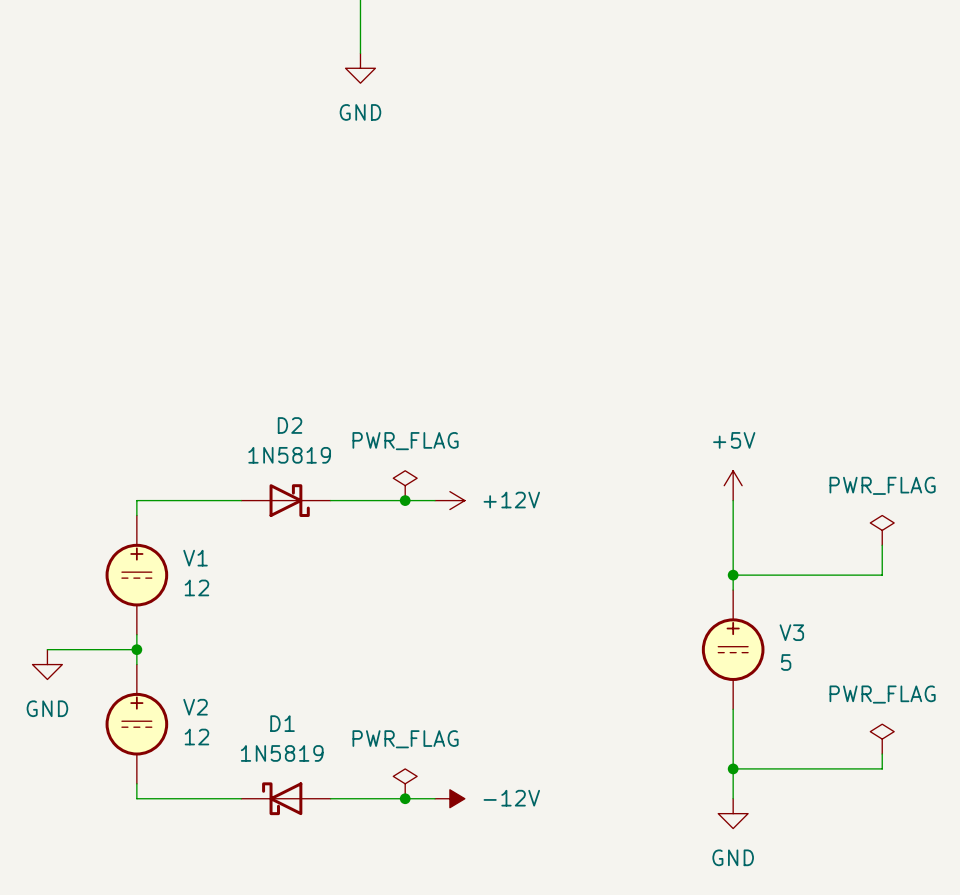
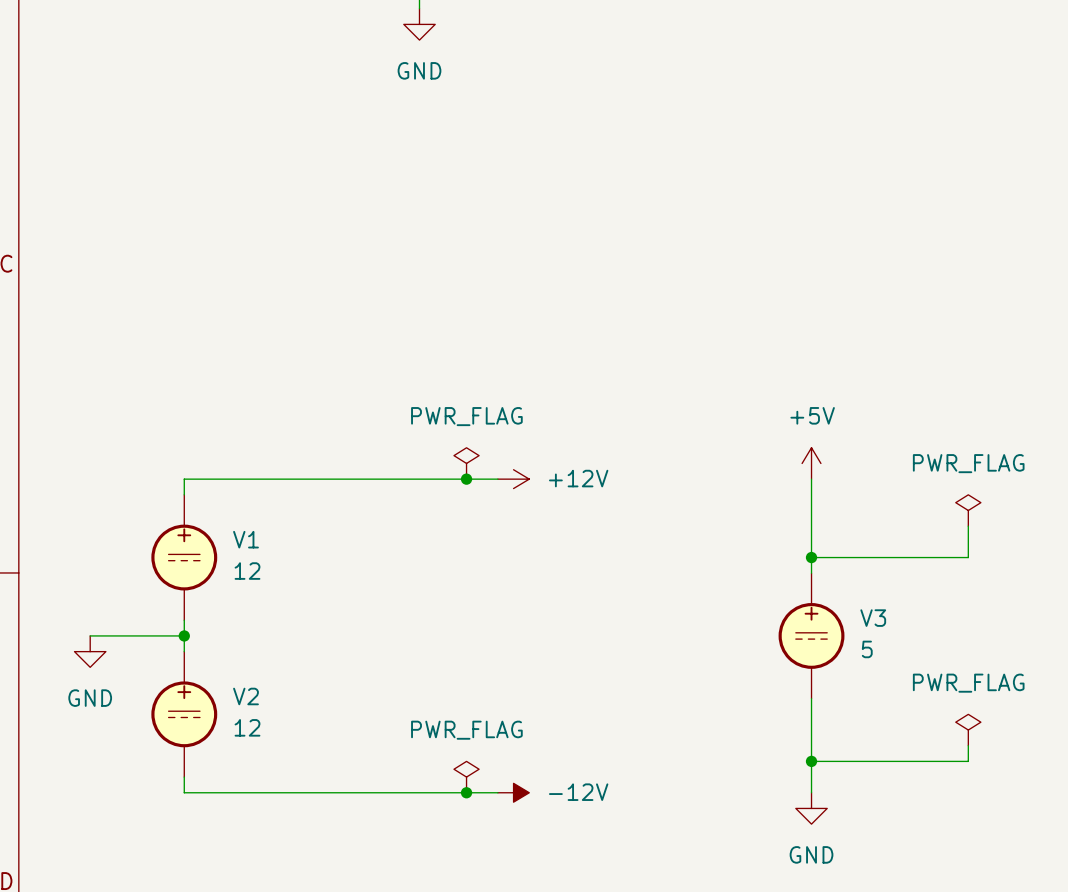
D2: 1N5819 (285, 500) -> none
D1: 1N5819 (285, 798) -> none

